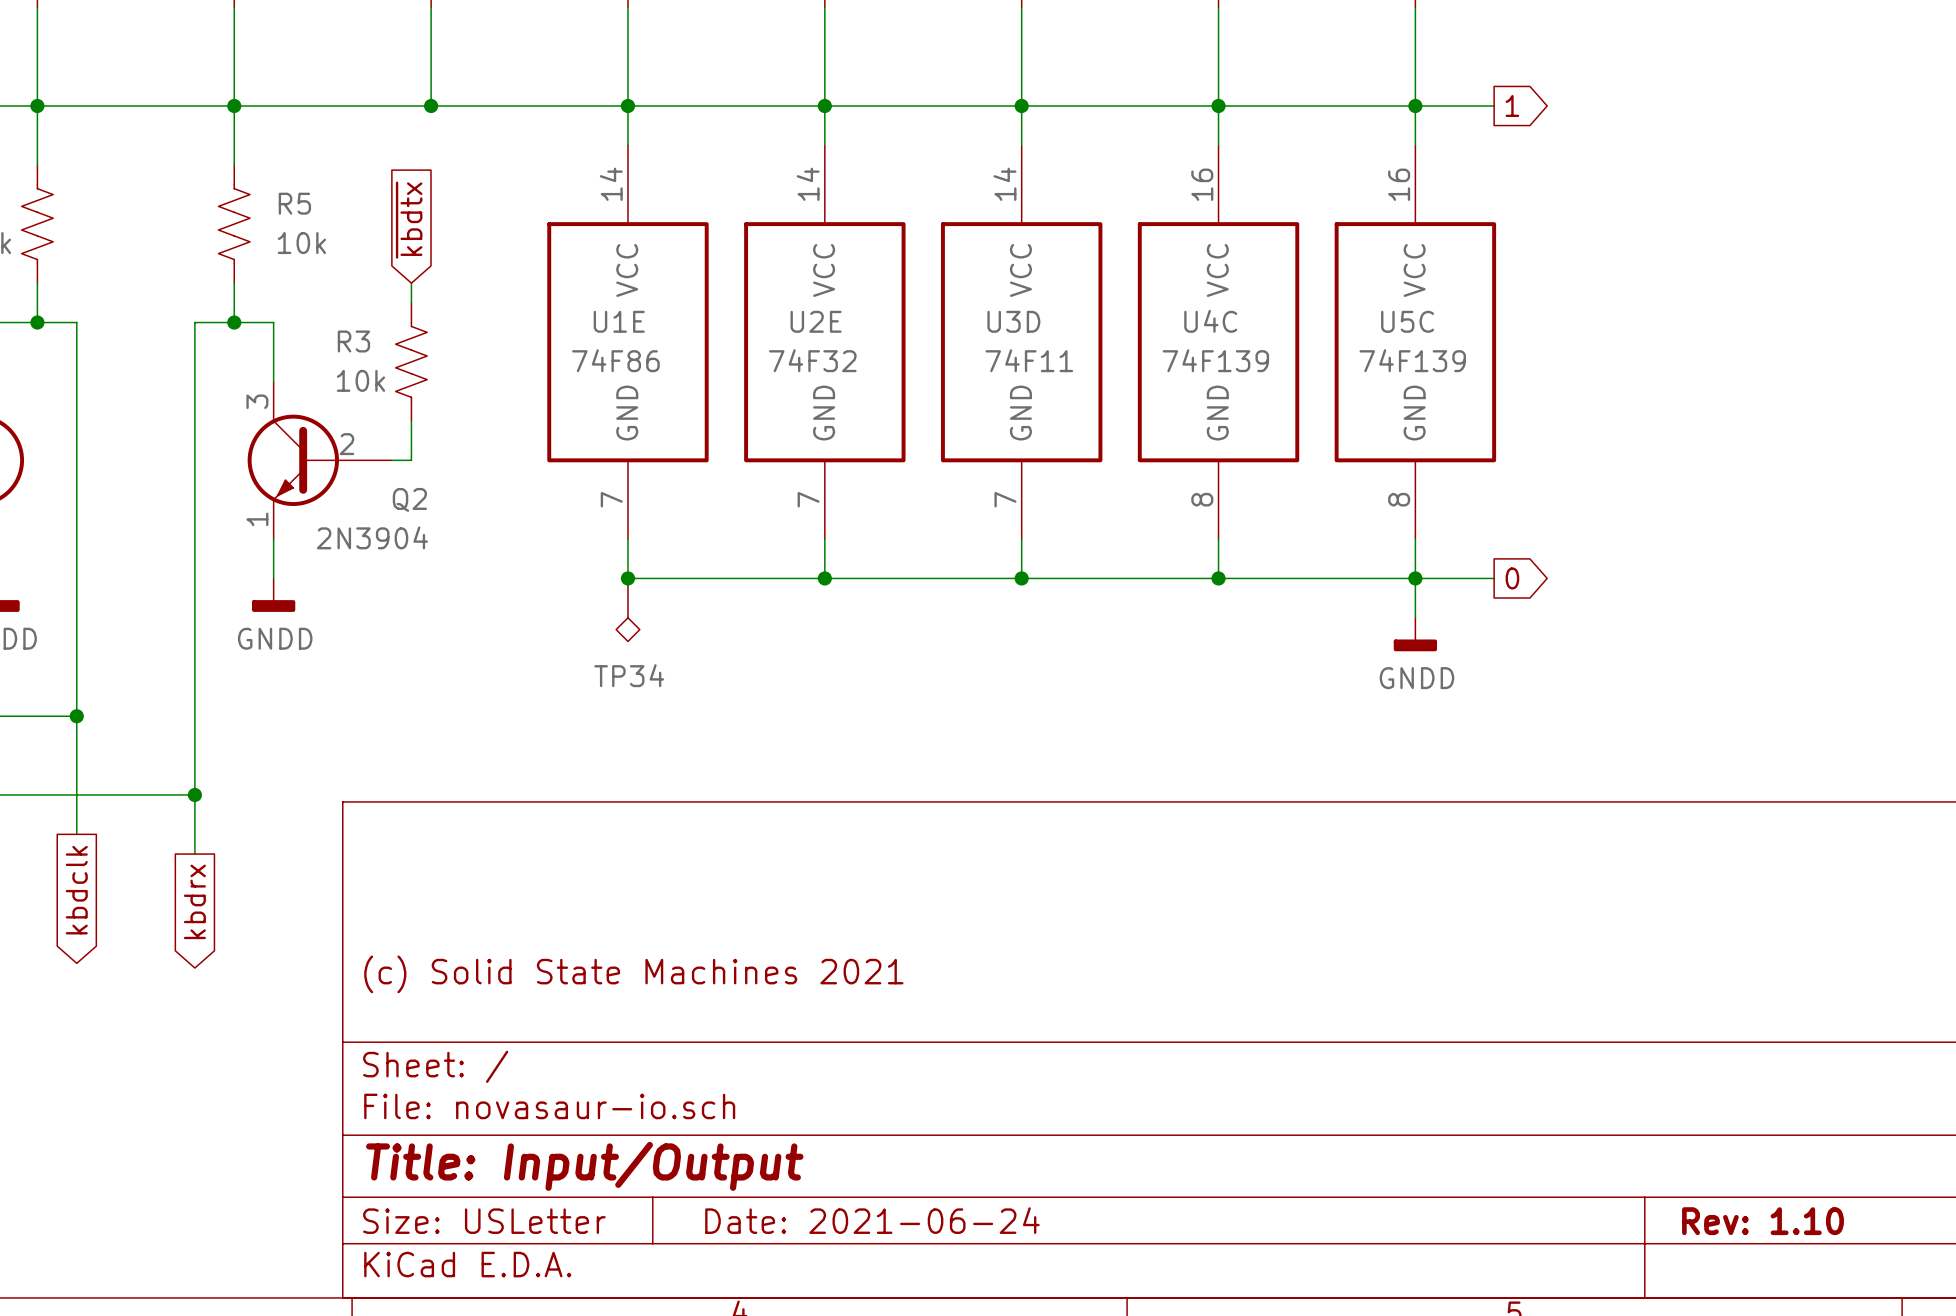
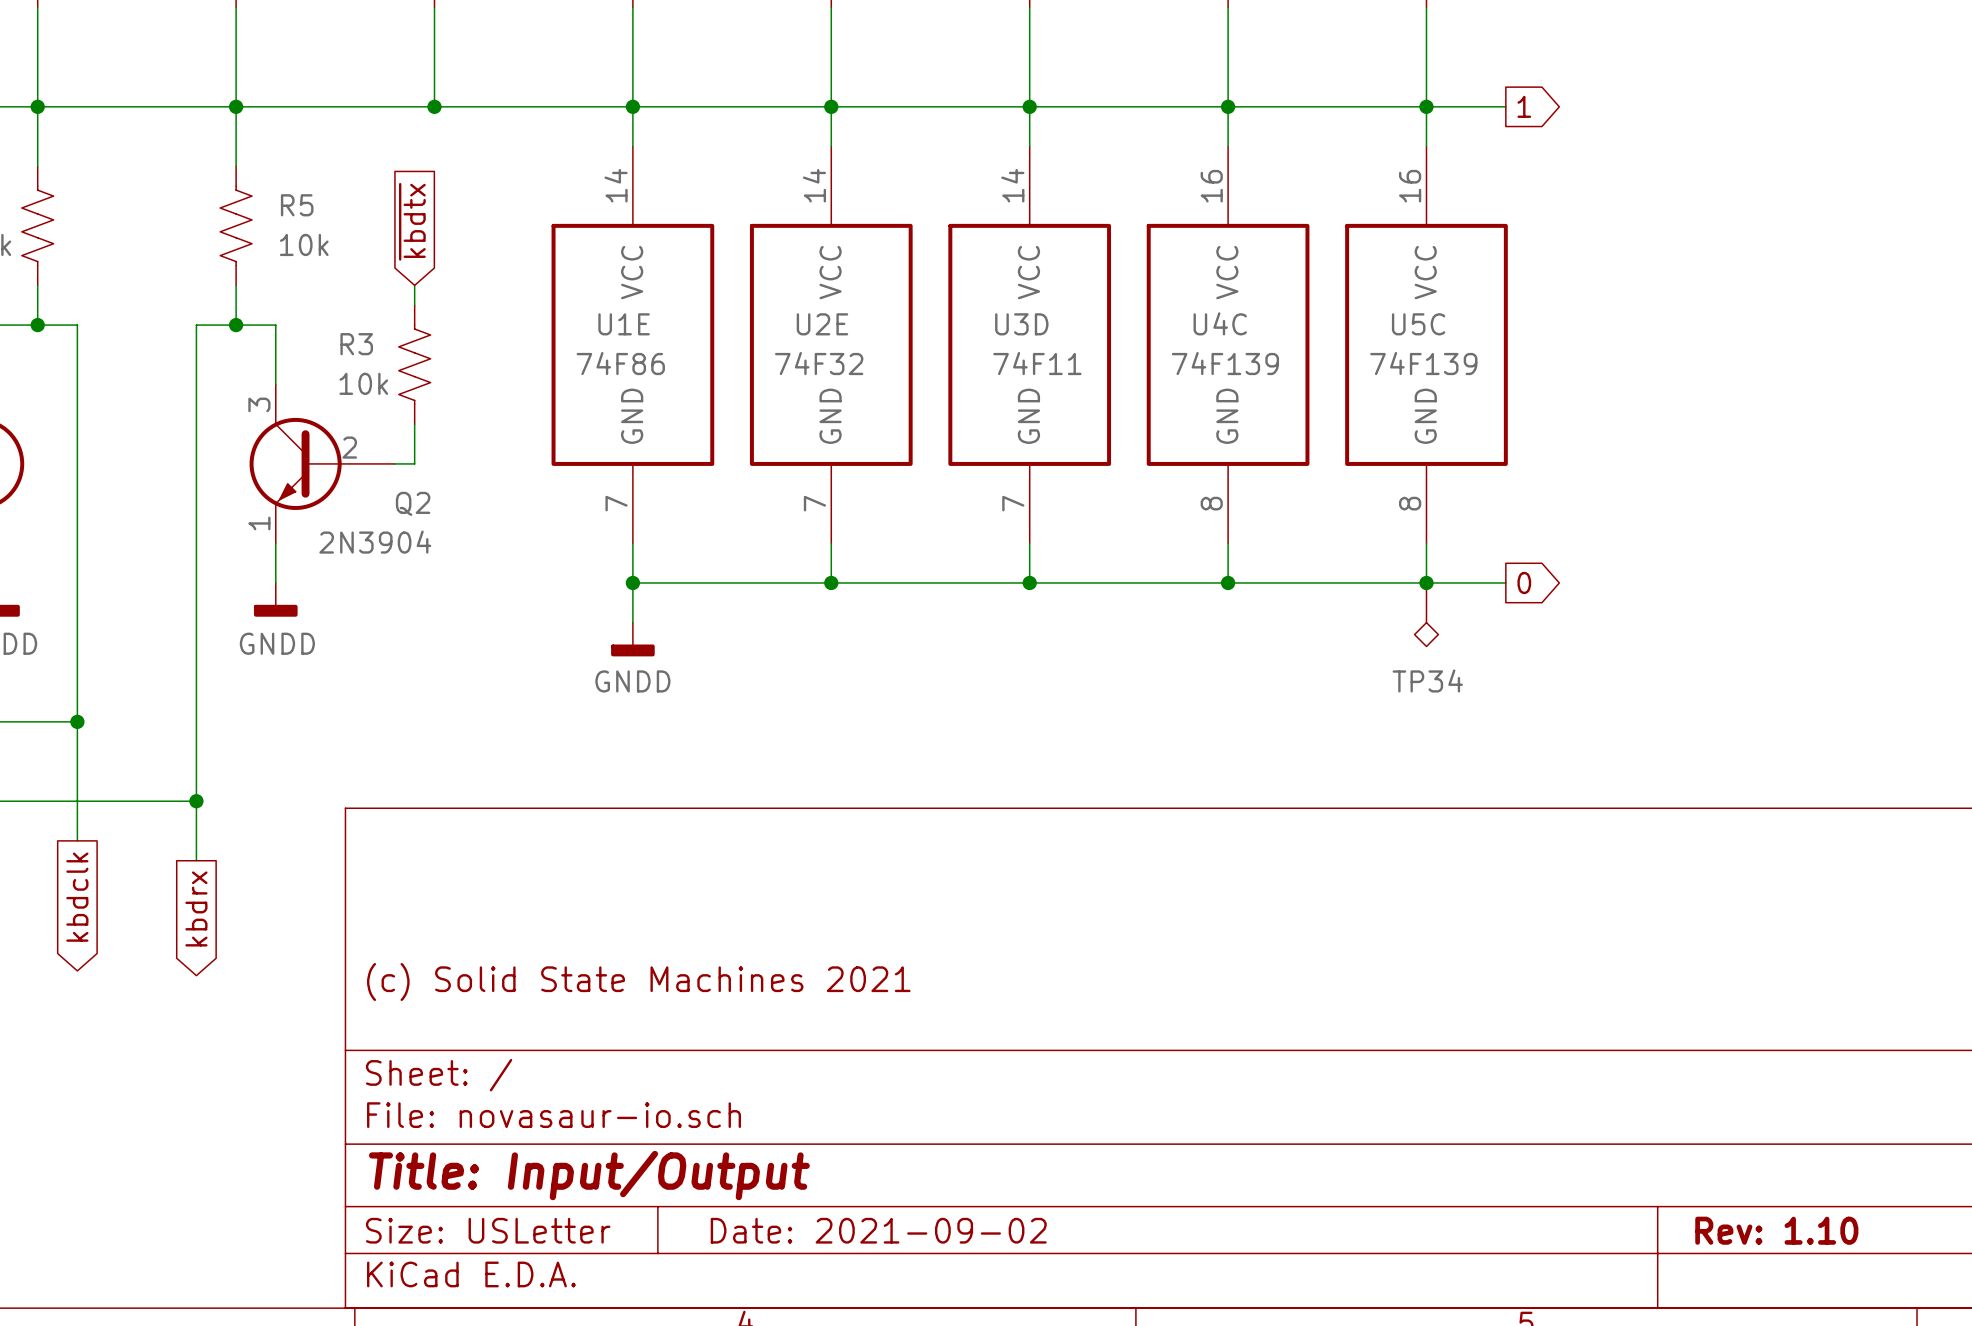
TP34 position: (627, 609) -> (1426, 614)
power symbol: none -> GNDD (632, 639)
power symbol: GNDD (1415, 634) -> none
title block: Date: 2021-06-24 (872, 1220) -> Date: 2021-09-02 (878, 1230)

